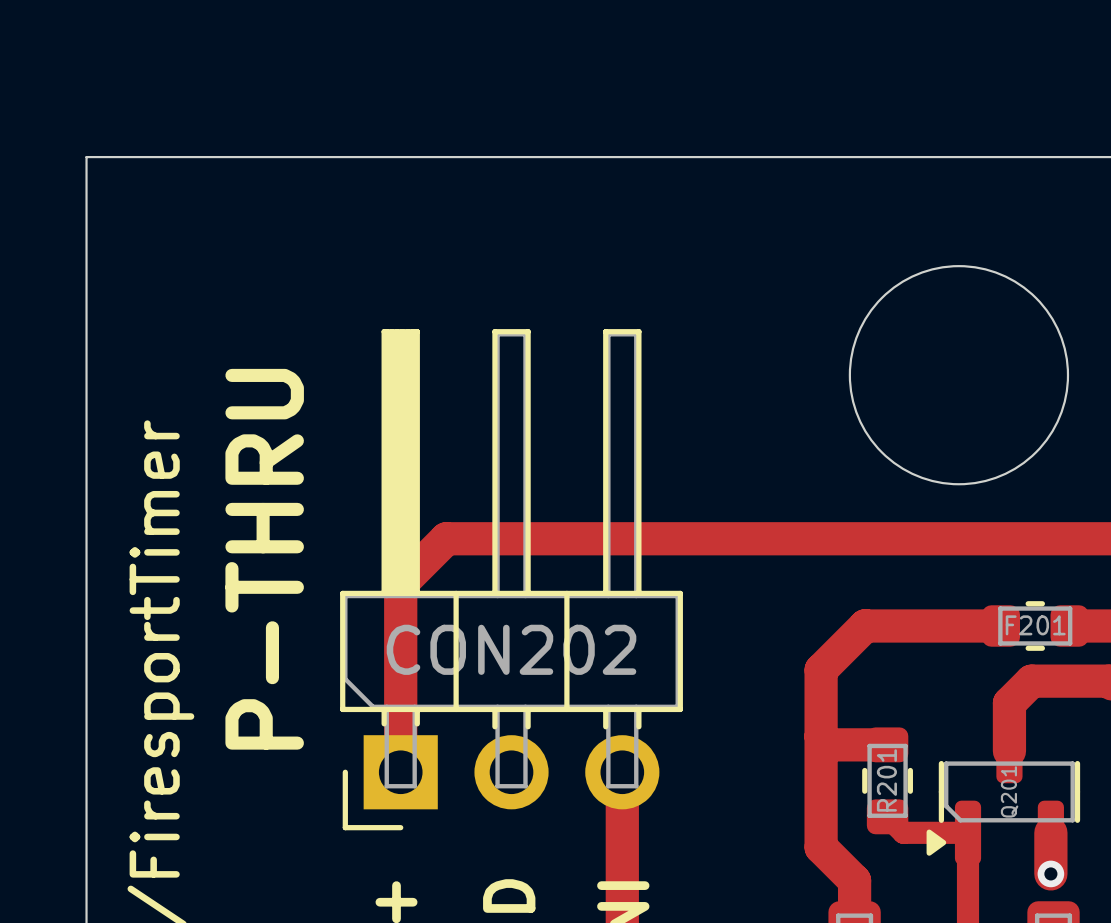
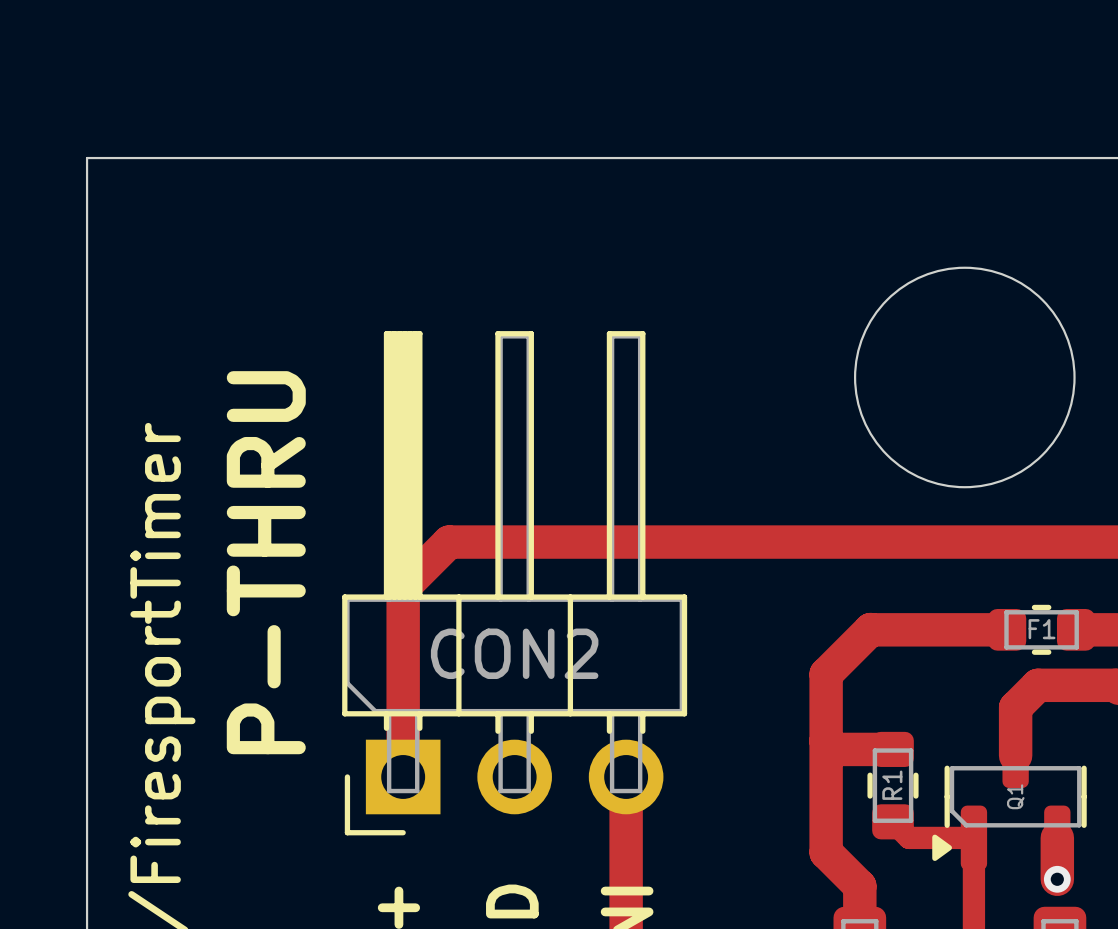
F201 name: F201 (1035, 625) -> F1 (1042, 629)
CON202 name: CON202 (511, 649) -> CON2 (514, 653)
R201 name: R201 (886, 780) -> R1 (892, 785)
Q201 name: Q201 (1009, 791) -> Q1 (1015, 796)

